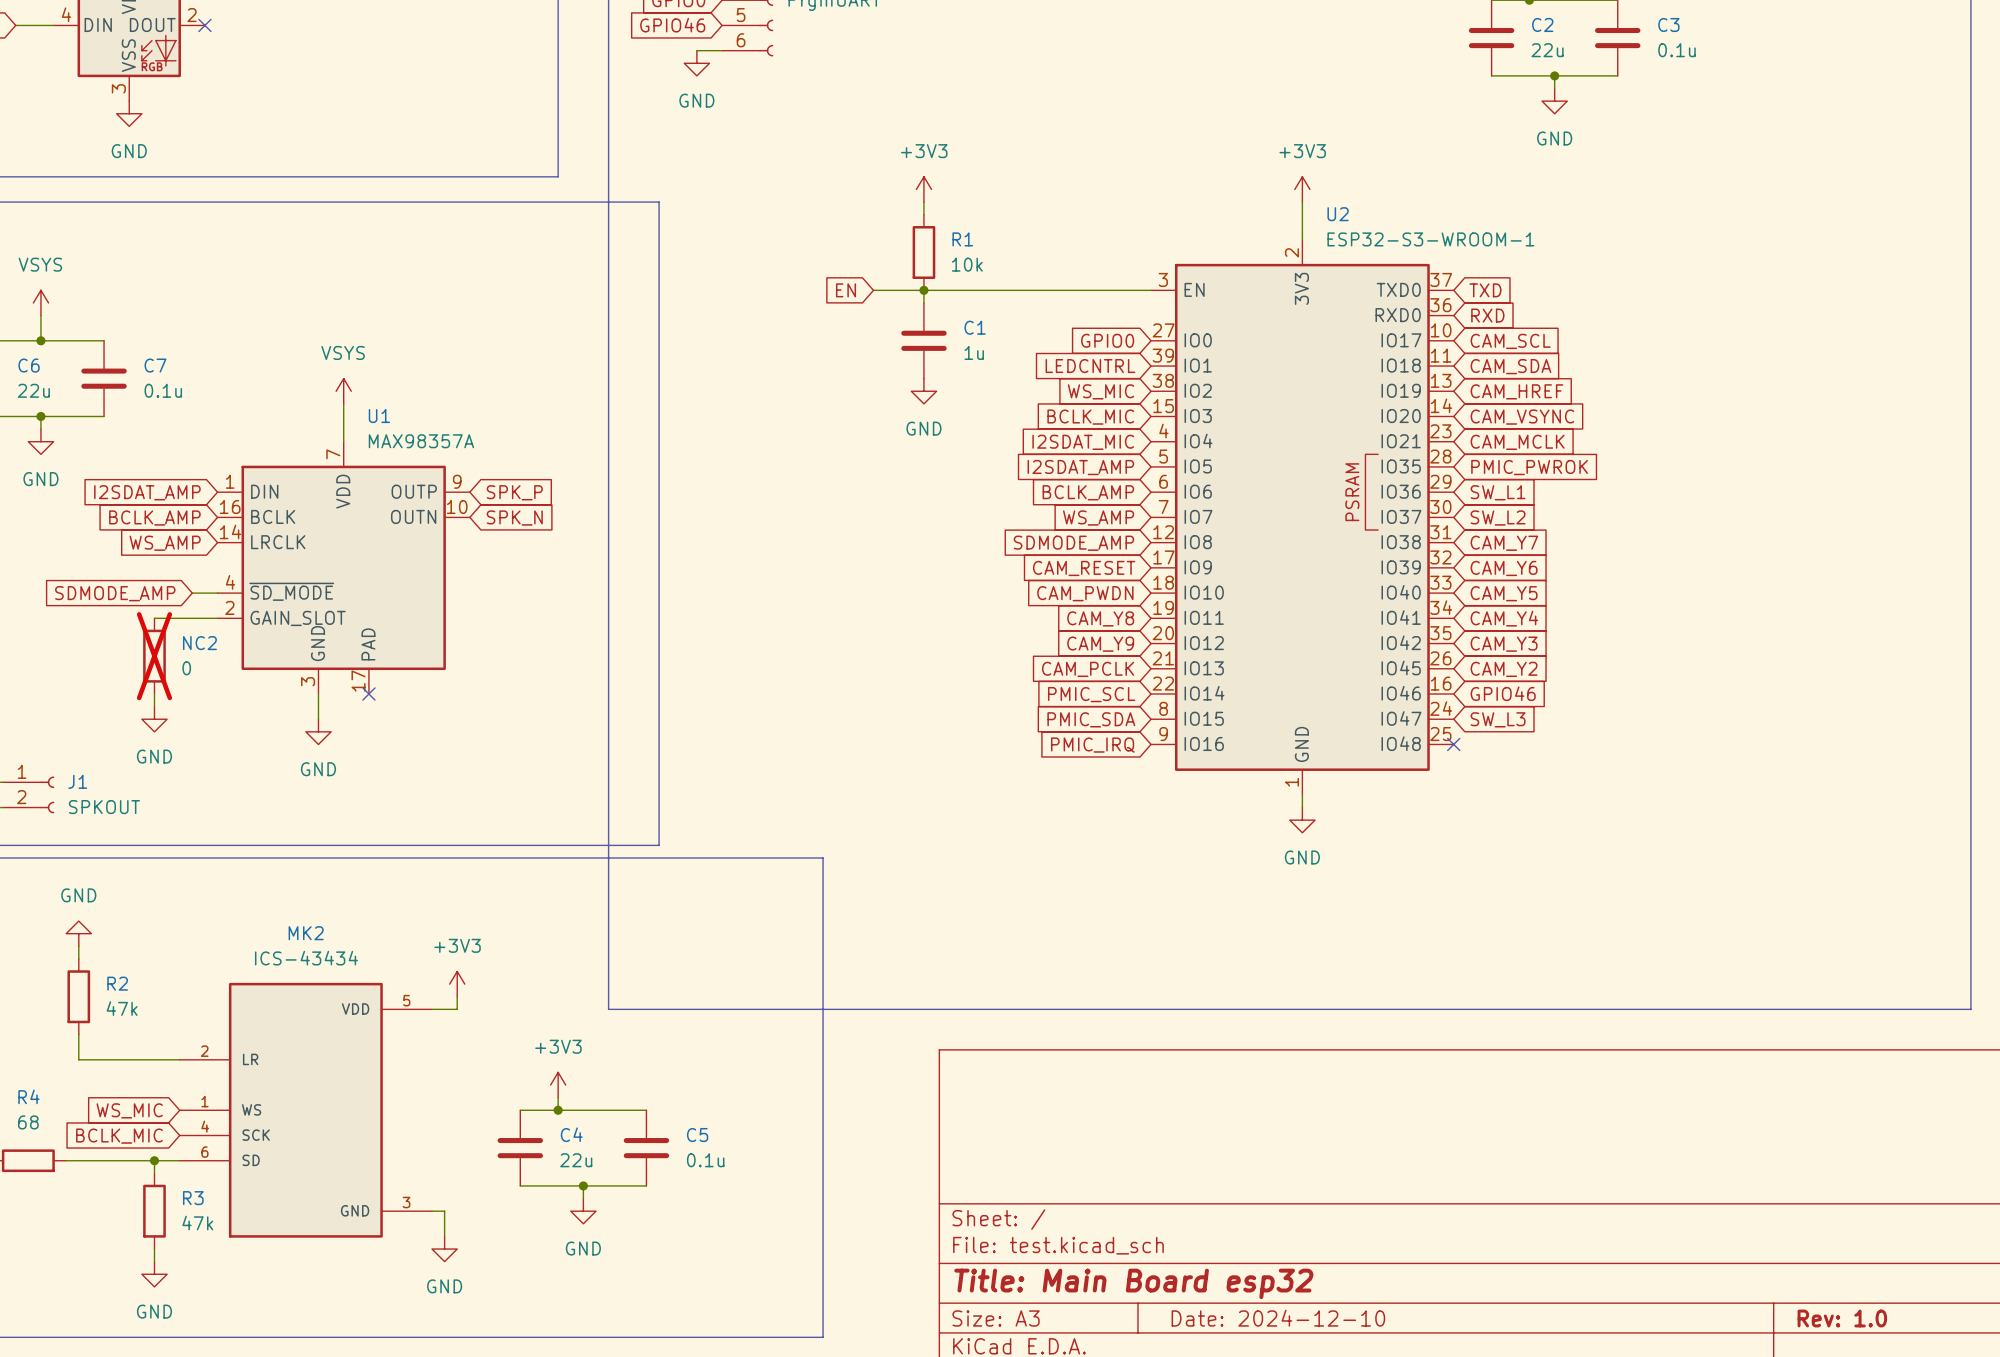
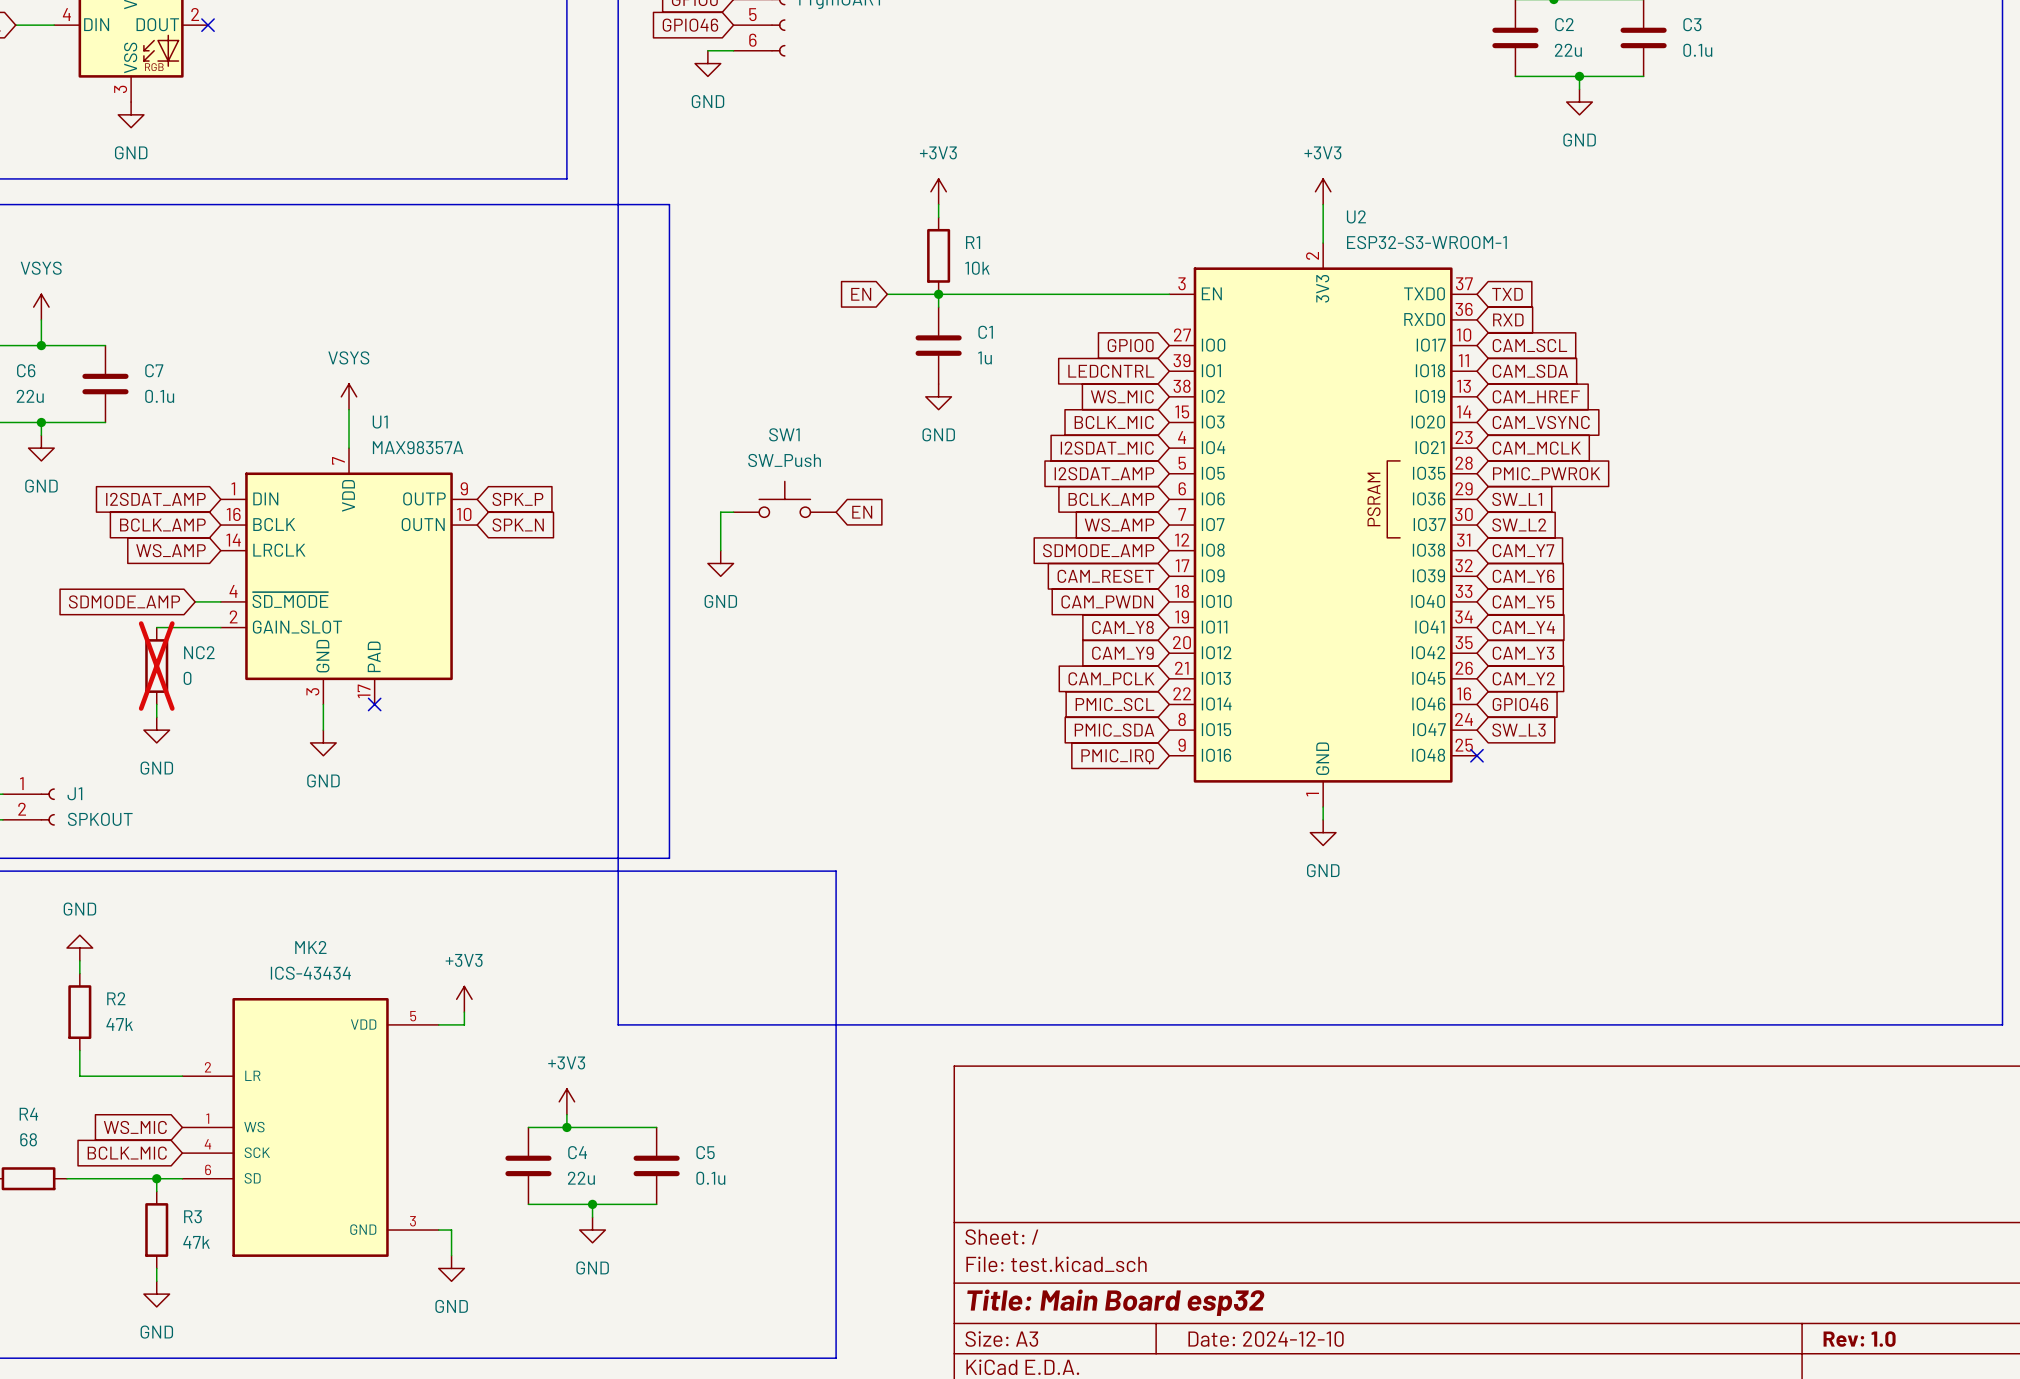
SW1: none -> SW_Push (784, 499)
wire: none -> (733, 512) (720, 512) (720, 550)
global label: none -> EN (862, 512)
power symbol: none -> GND (720, 563)

